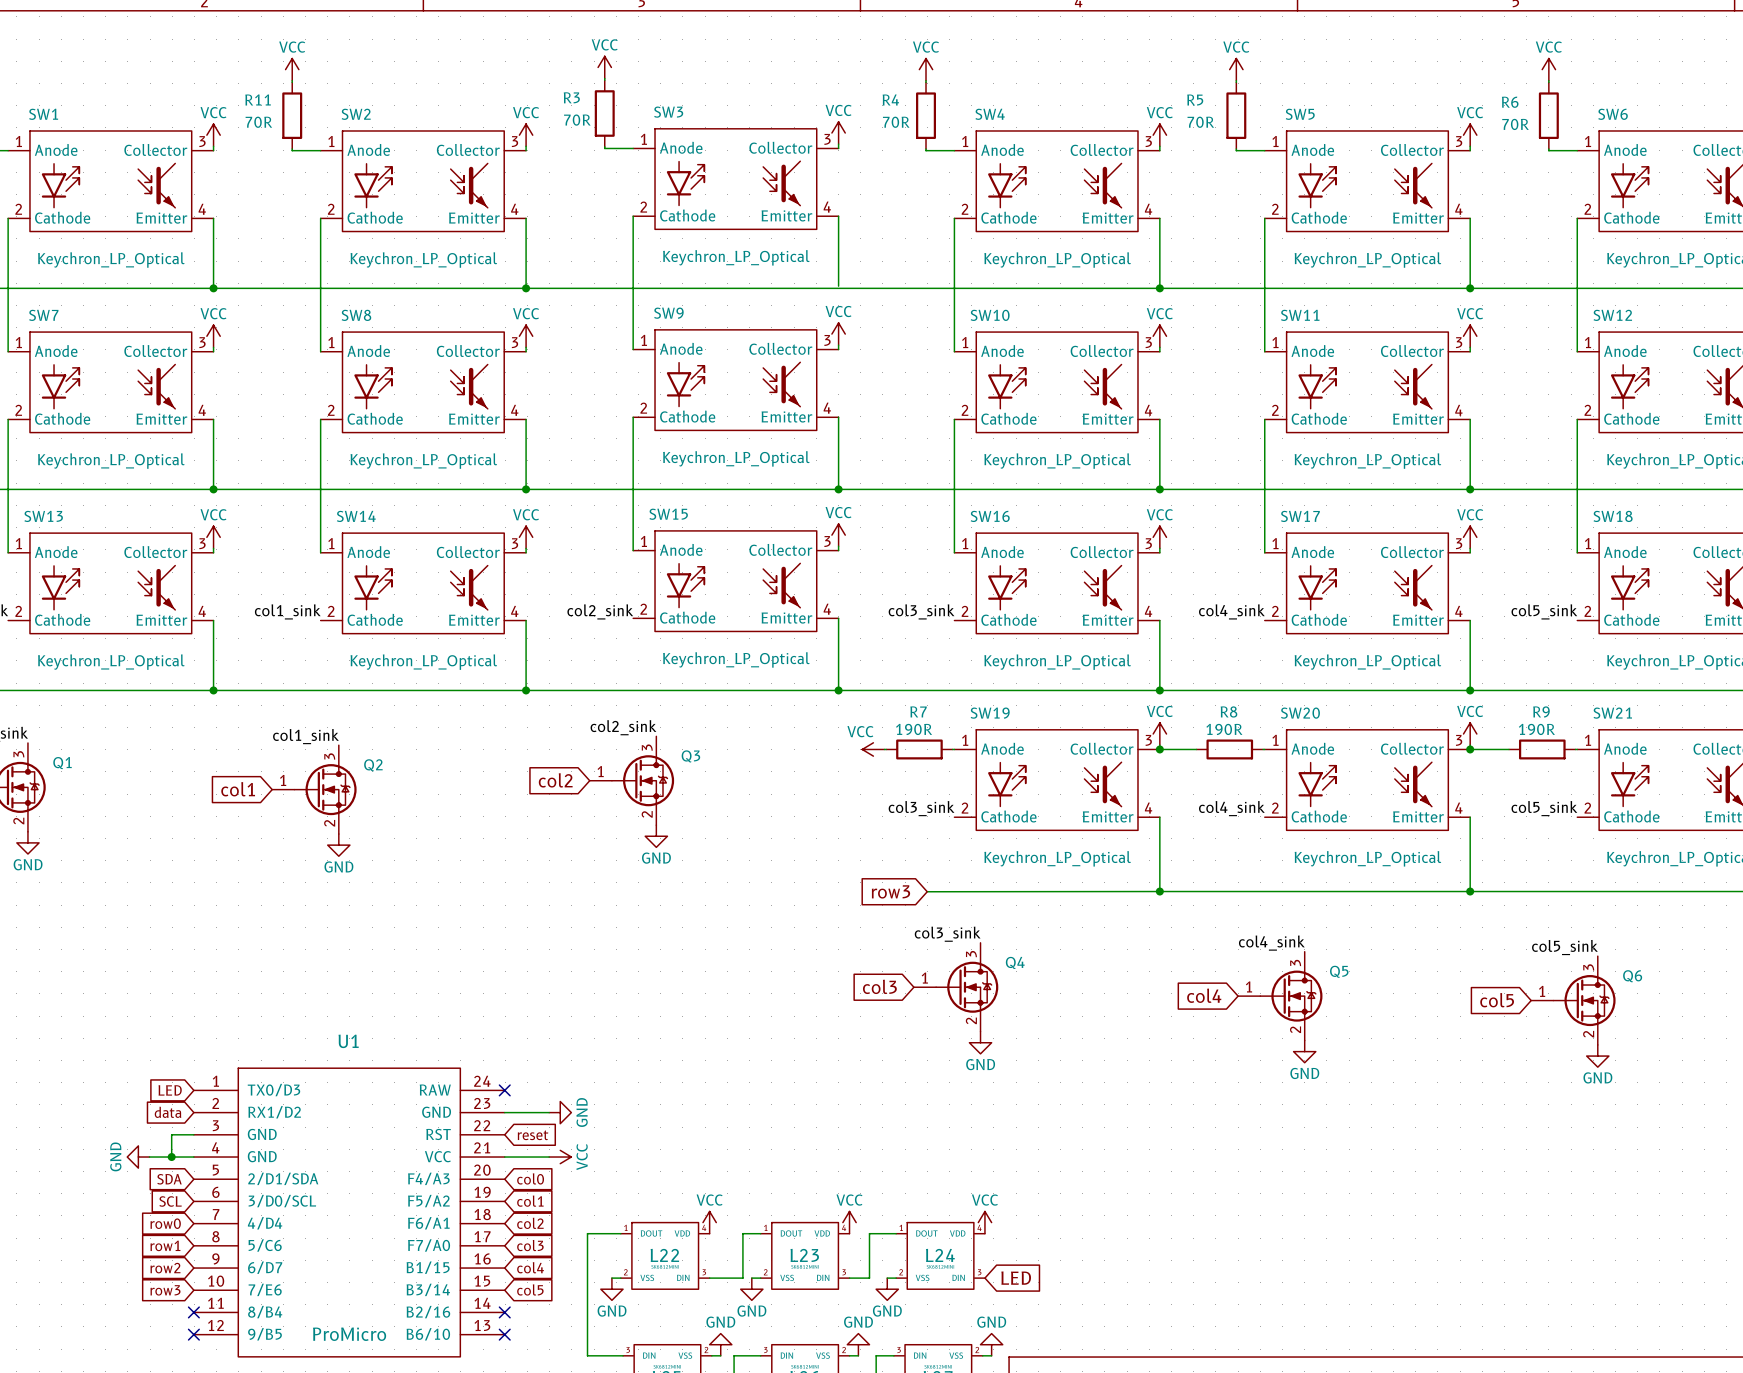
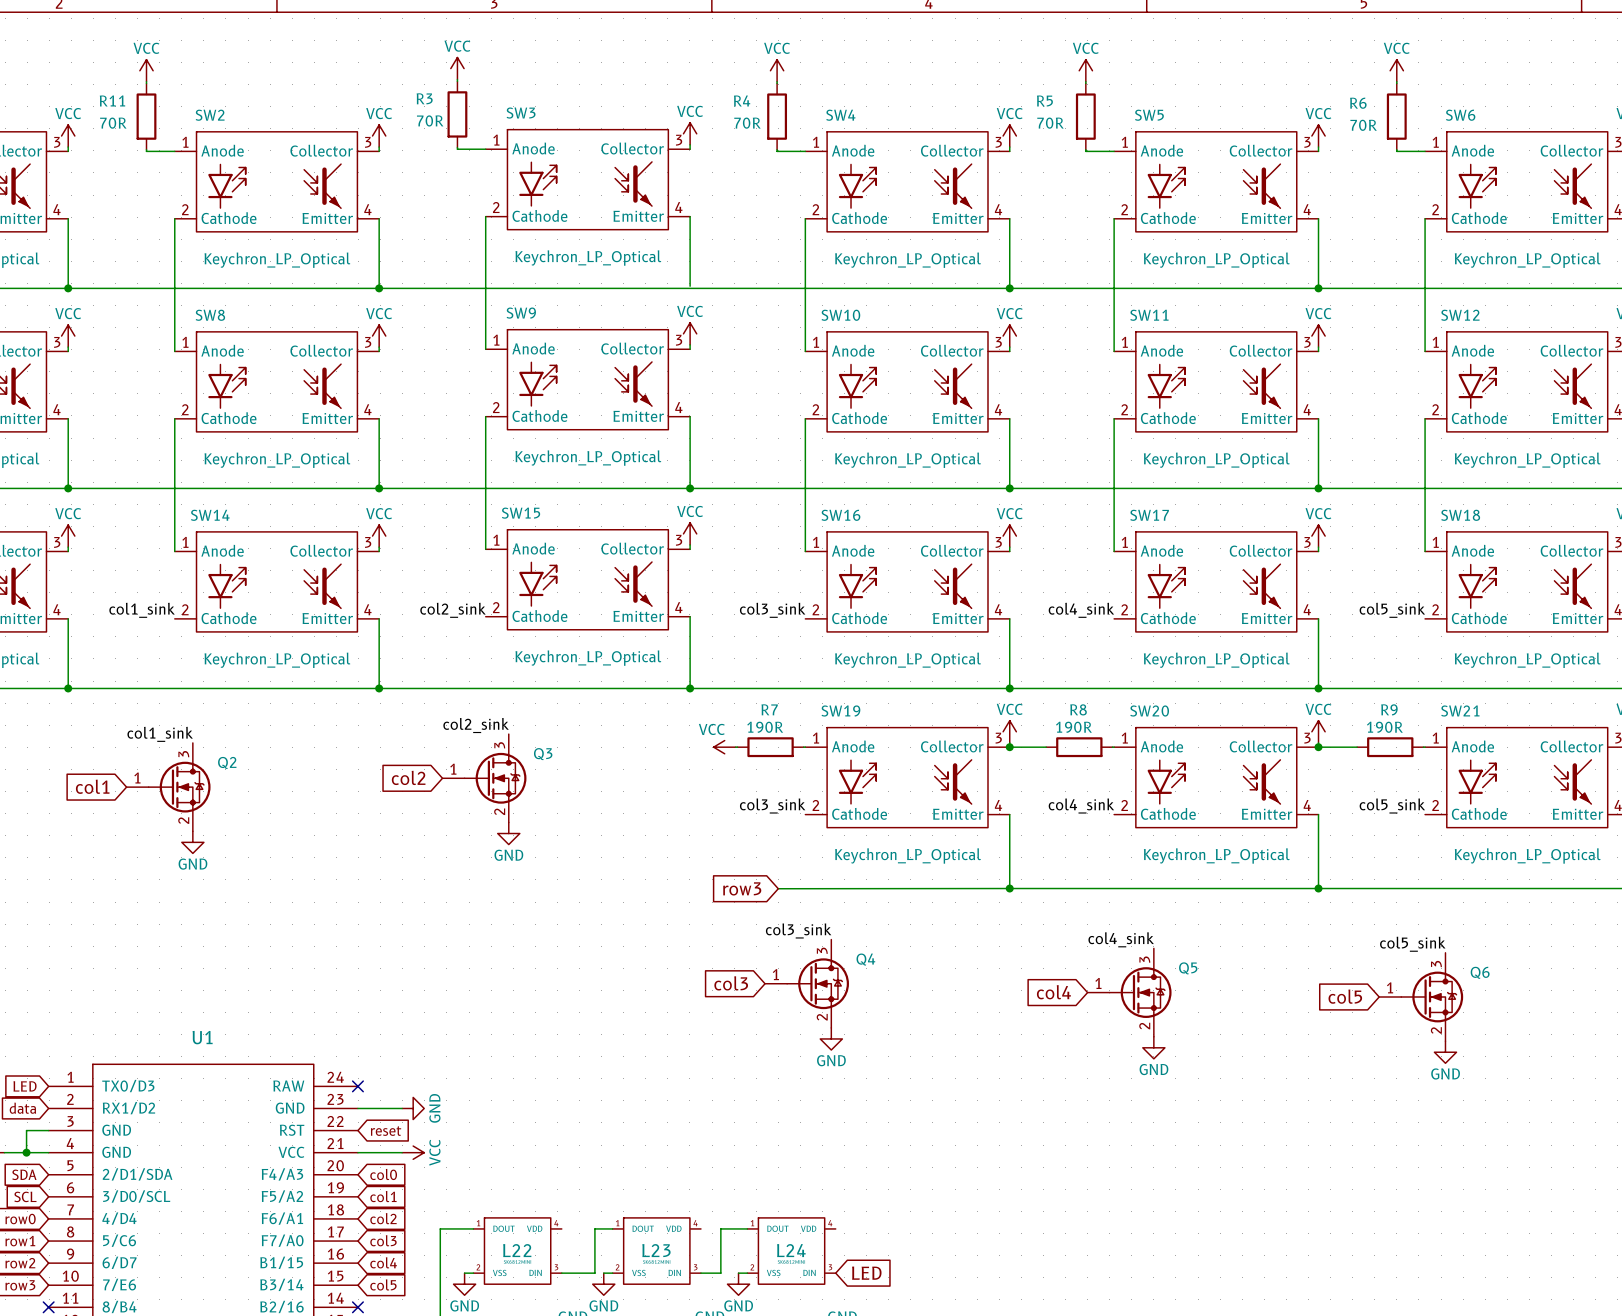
power symbol: VCC (709, 1222) -> none
power symbol: VCC (849, 1222) -> none
power symbol: VCC (984, 1222) -> none

